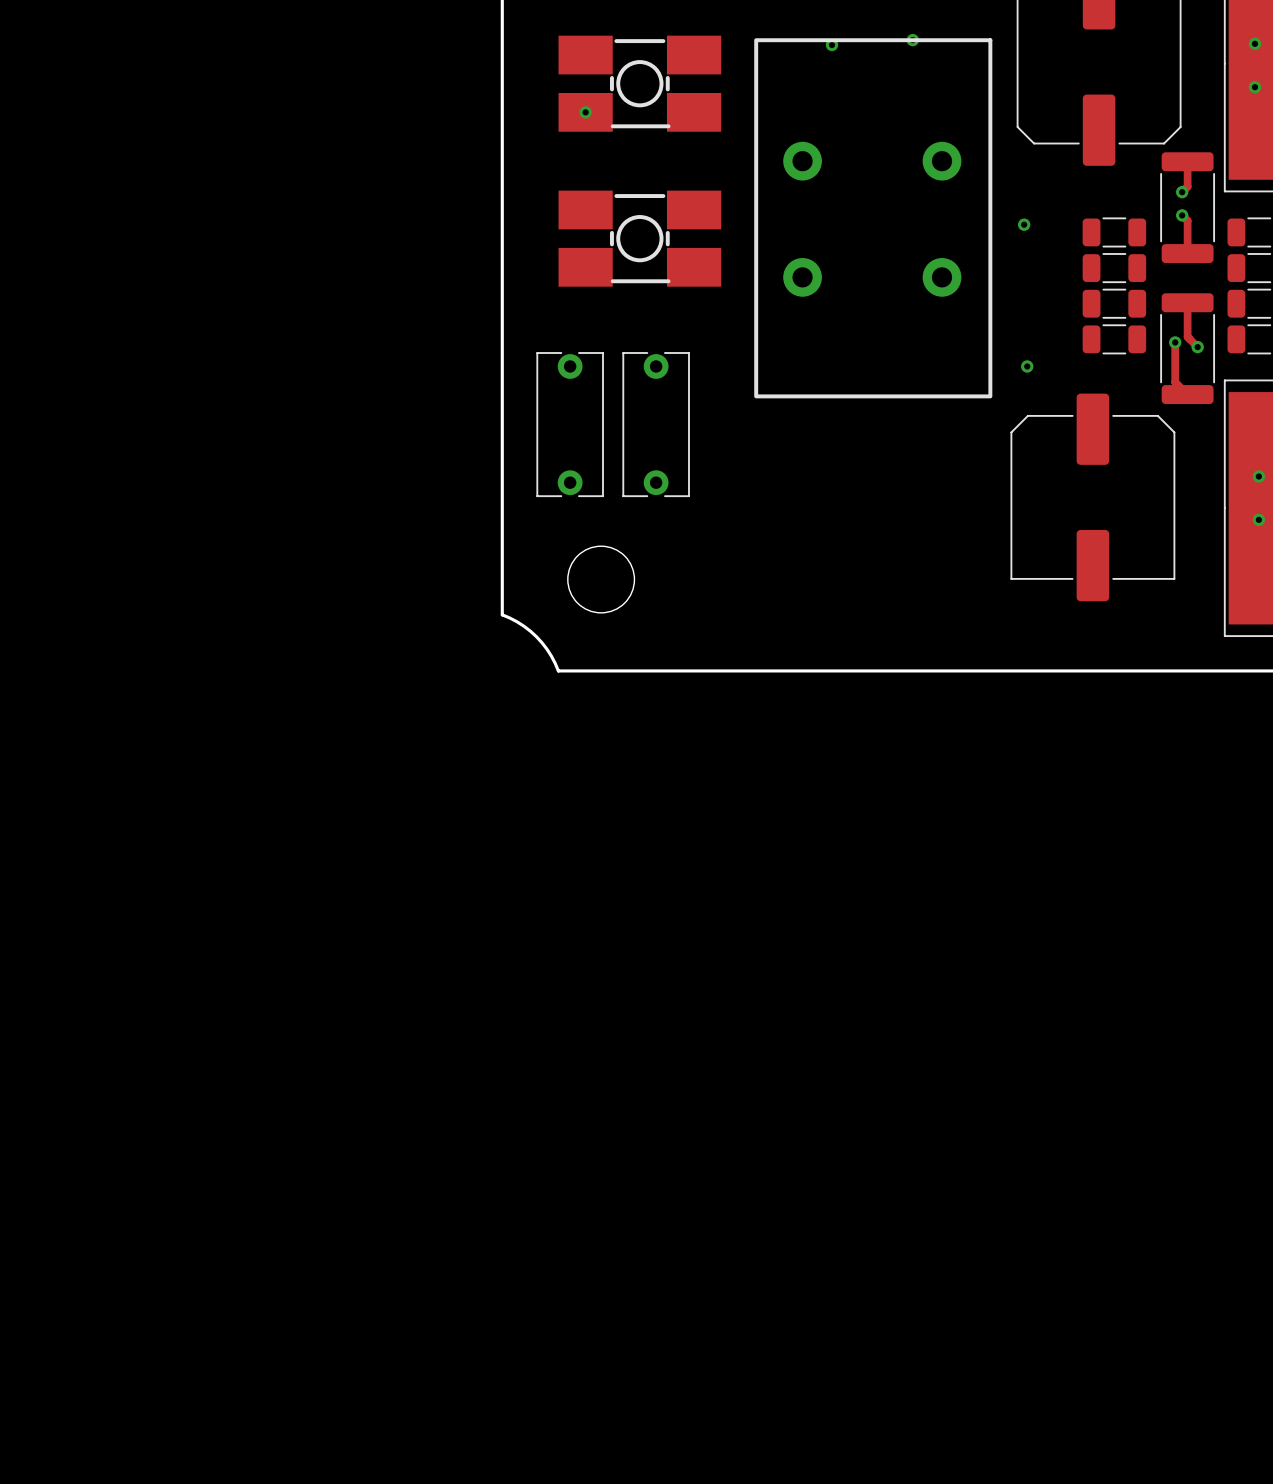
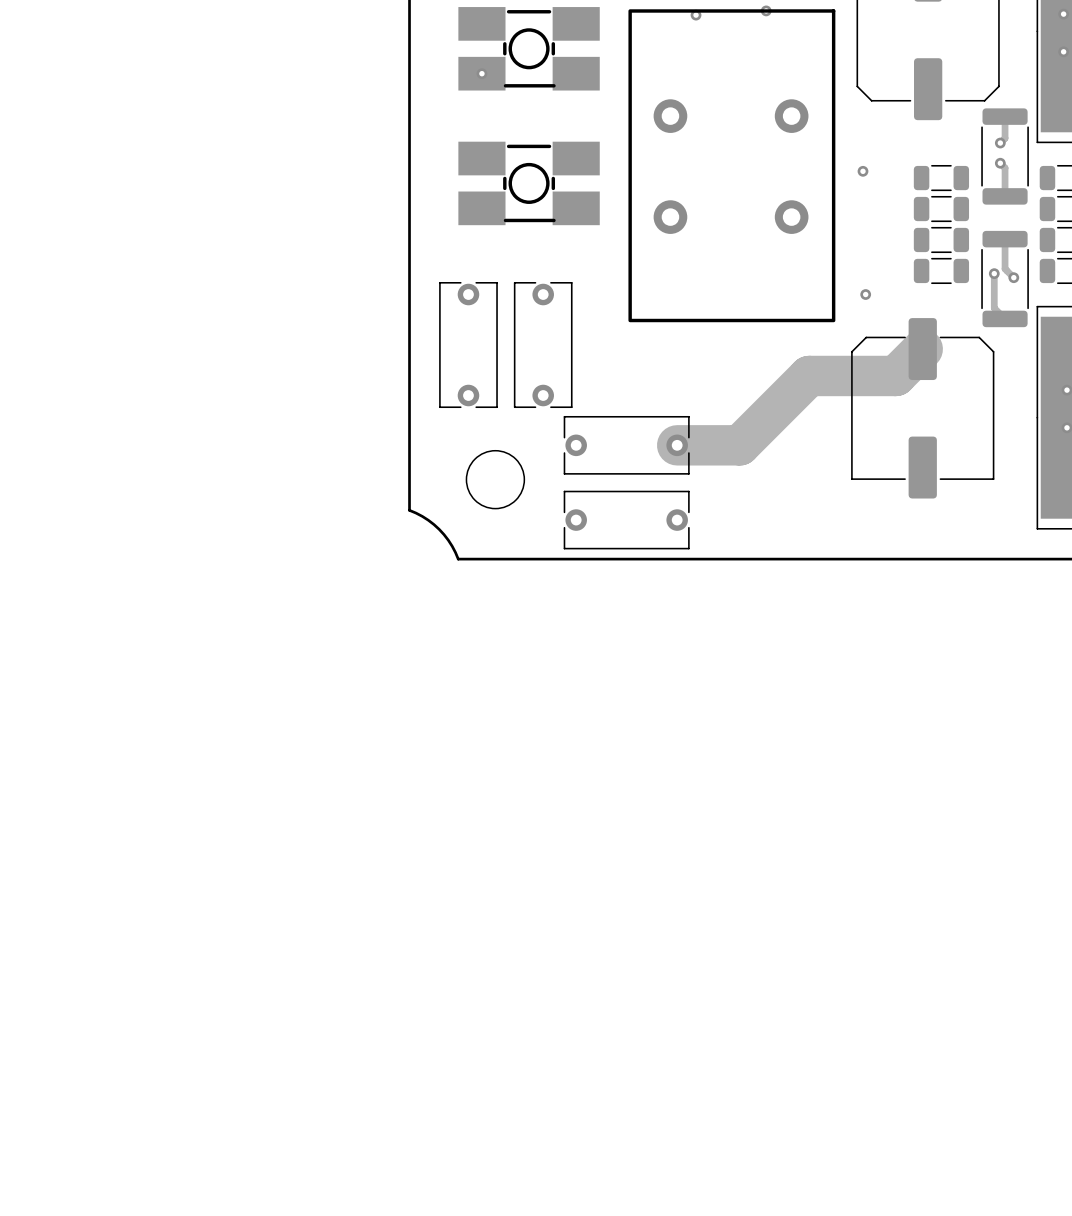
track: none -> (922, 349) (895, 375) (809, 375) (739, 445) (677, 445)
part: none -> (626, 445)
part: none -> (626, 520)

